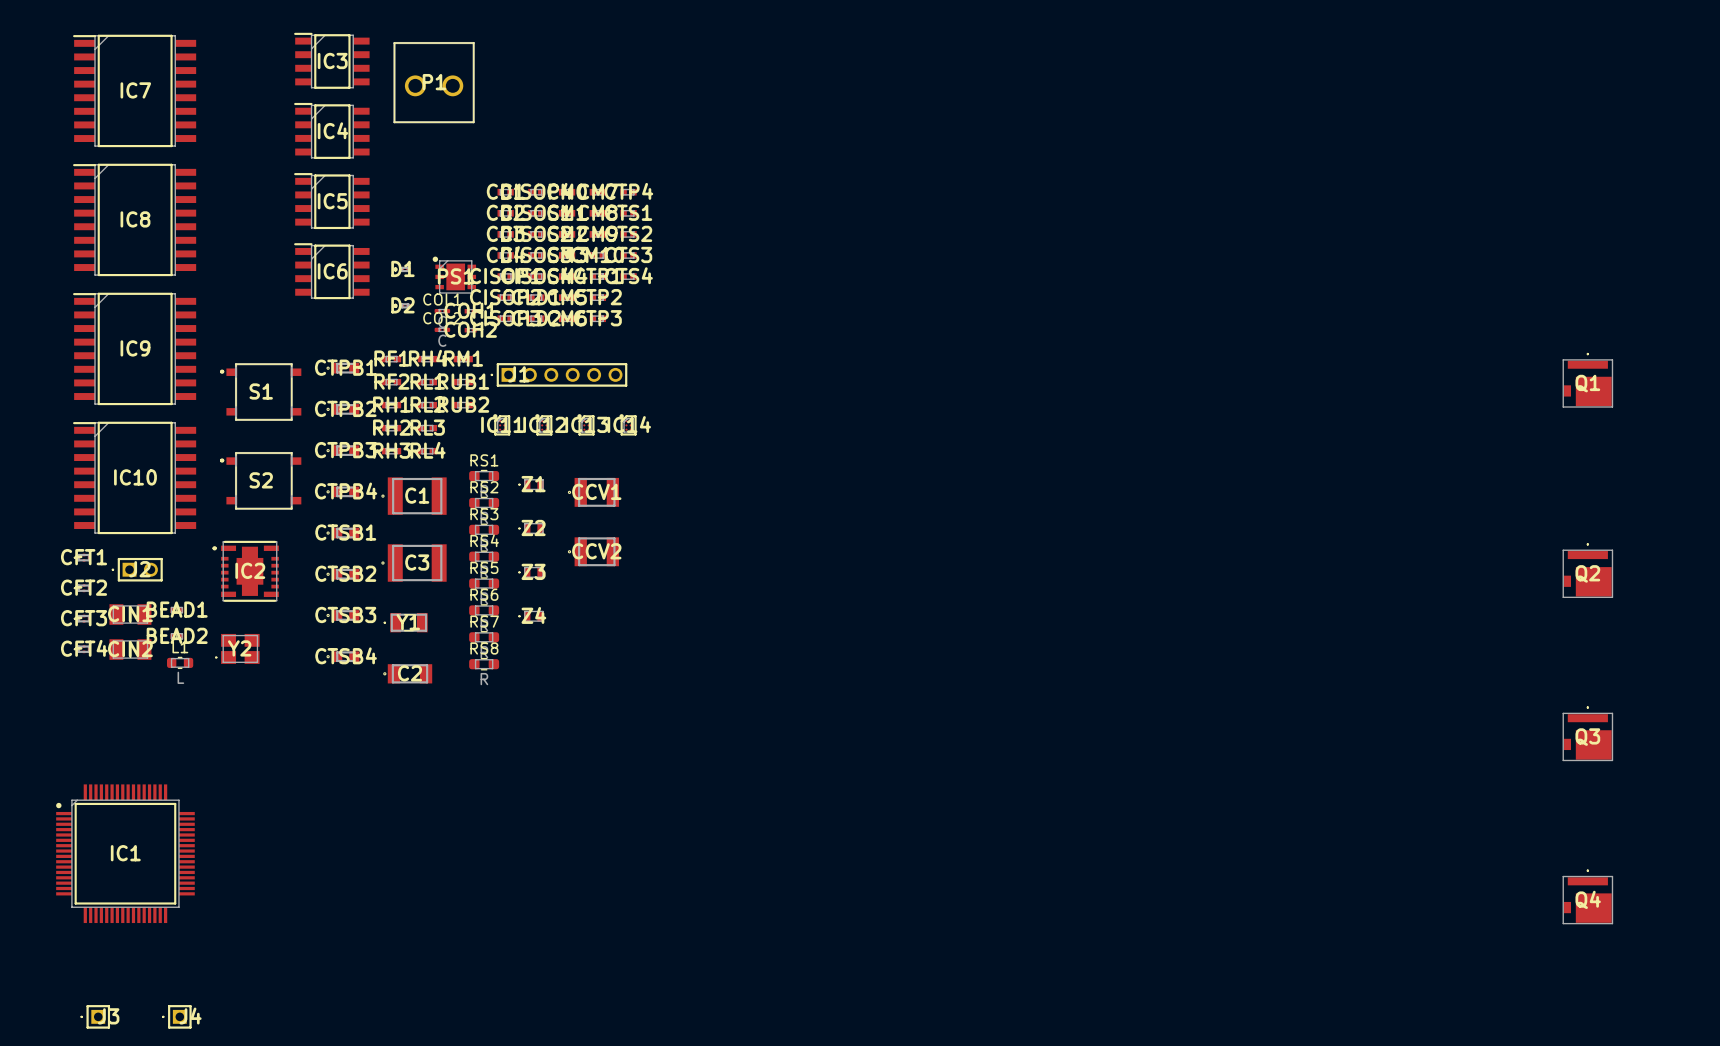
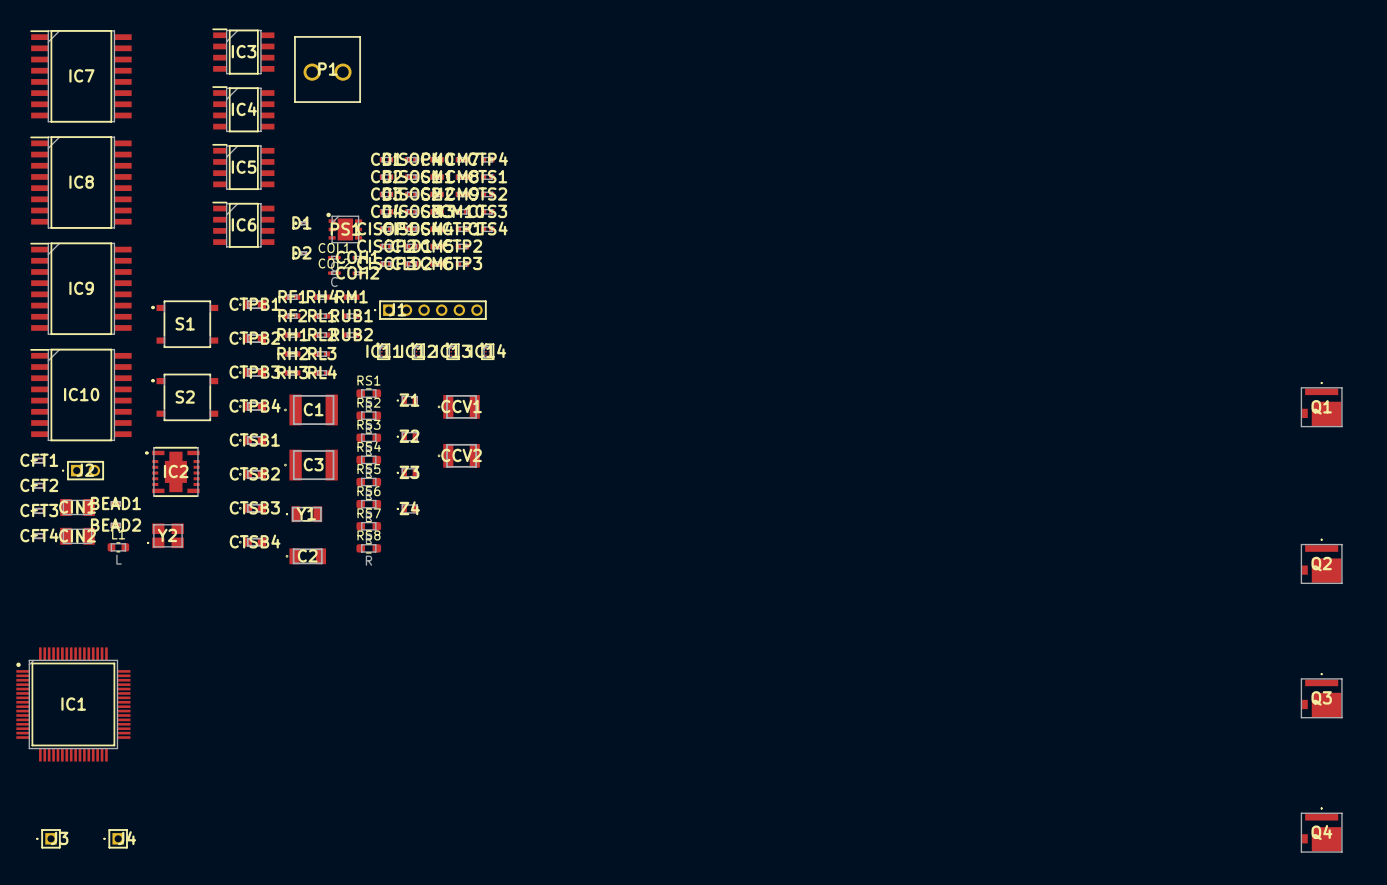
Q1 position: (1587, 380) -> (1321, 404)
Q2 position: (1587, 570) -> (1321, 561)
Q3 position: (1587, 733) -> (1321, 695)
Q4 position: (1587, 896) -> (1321, 830)

